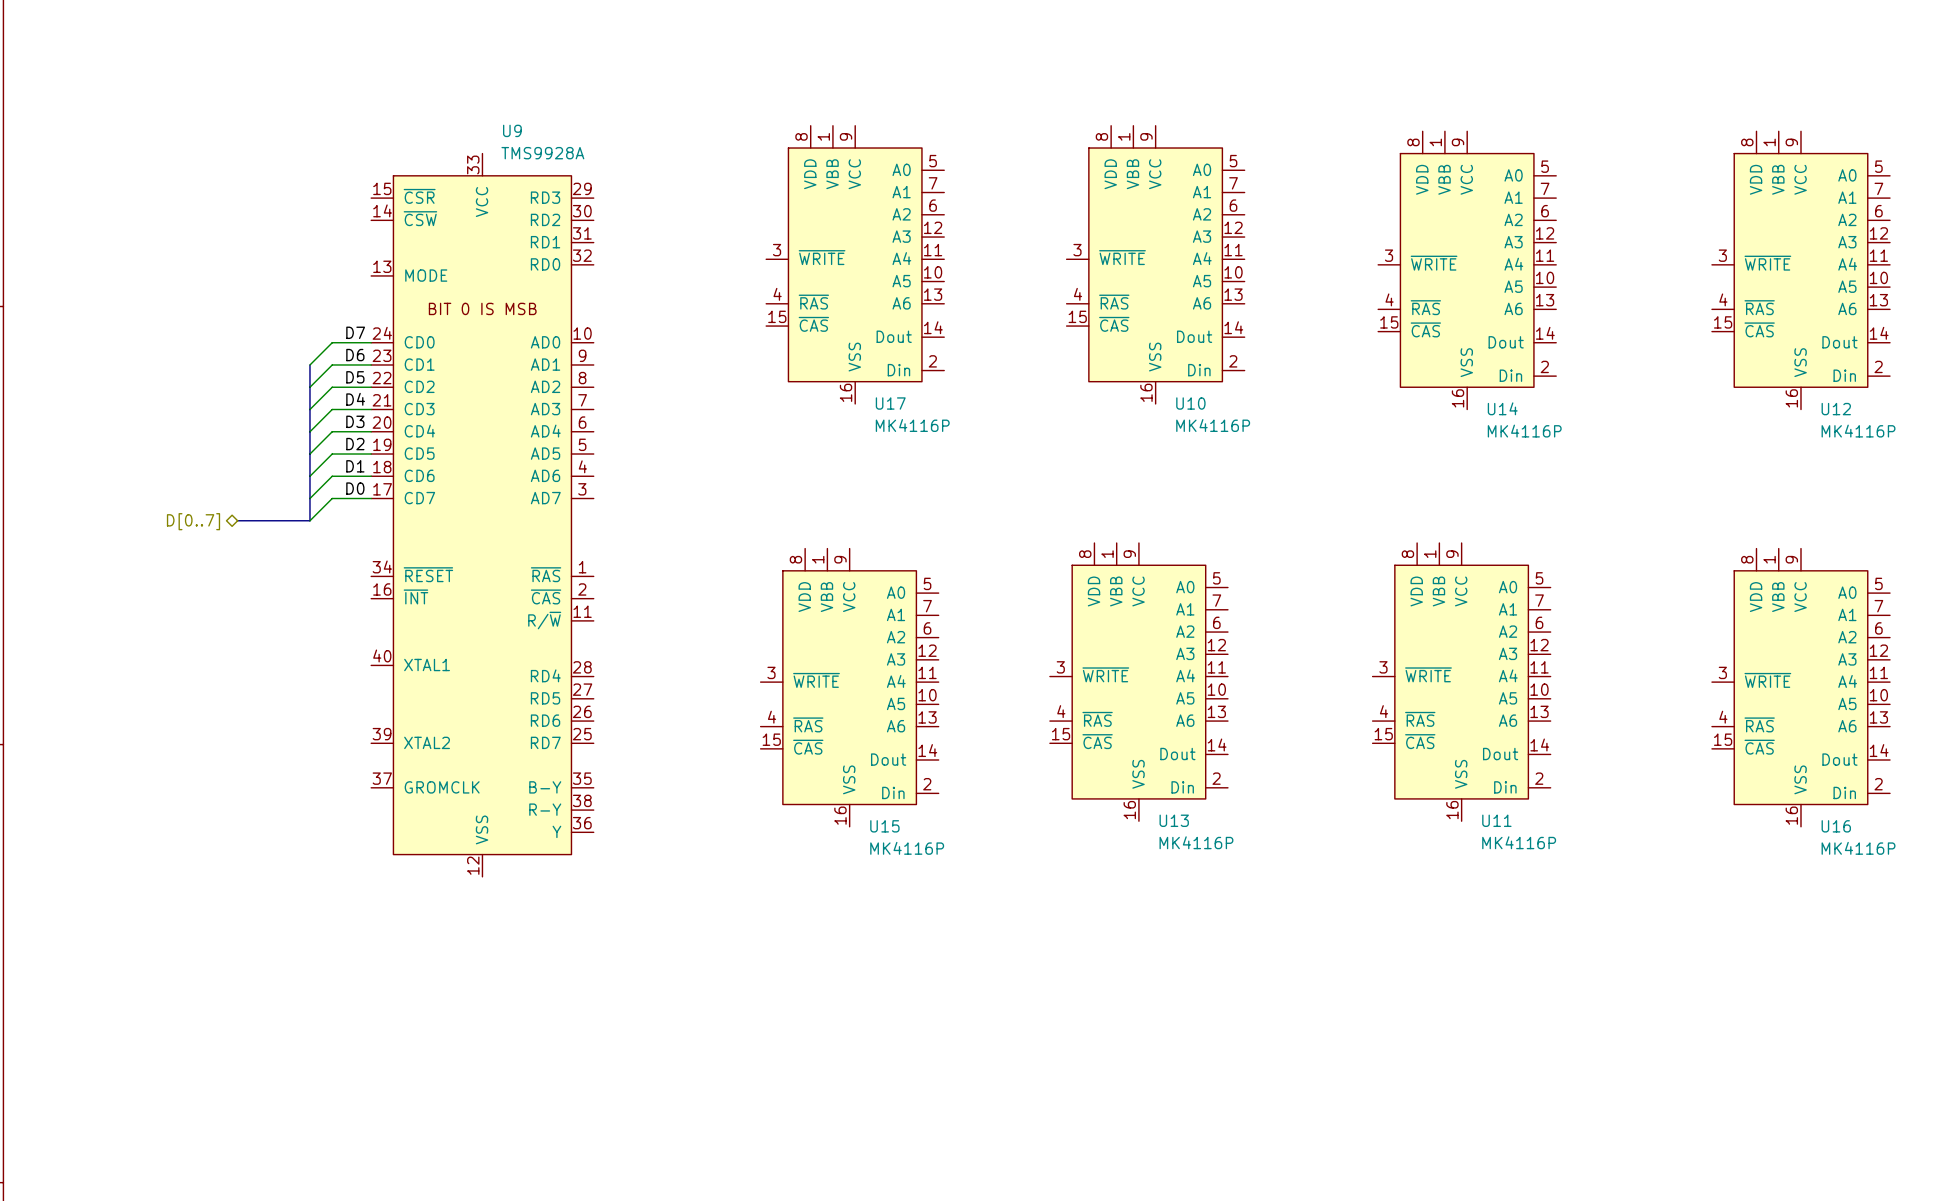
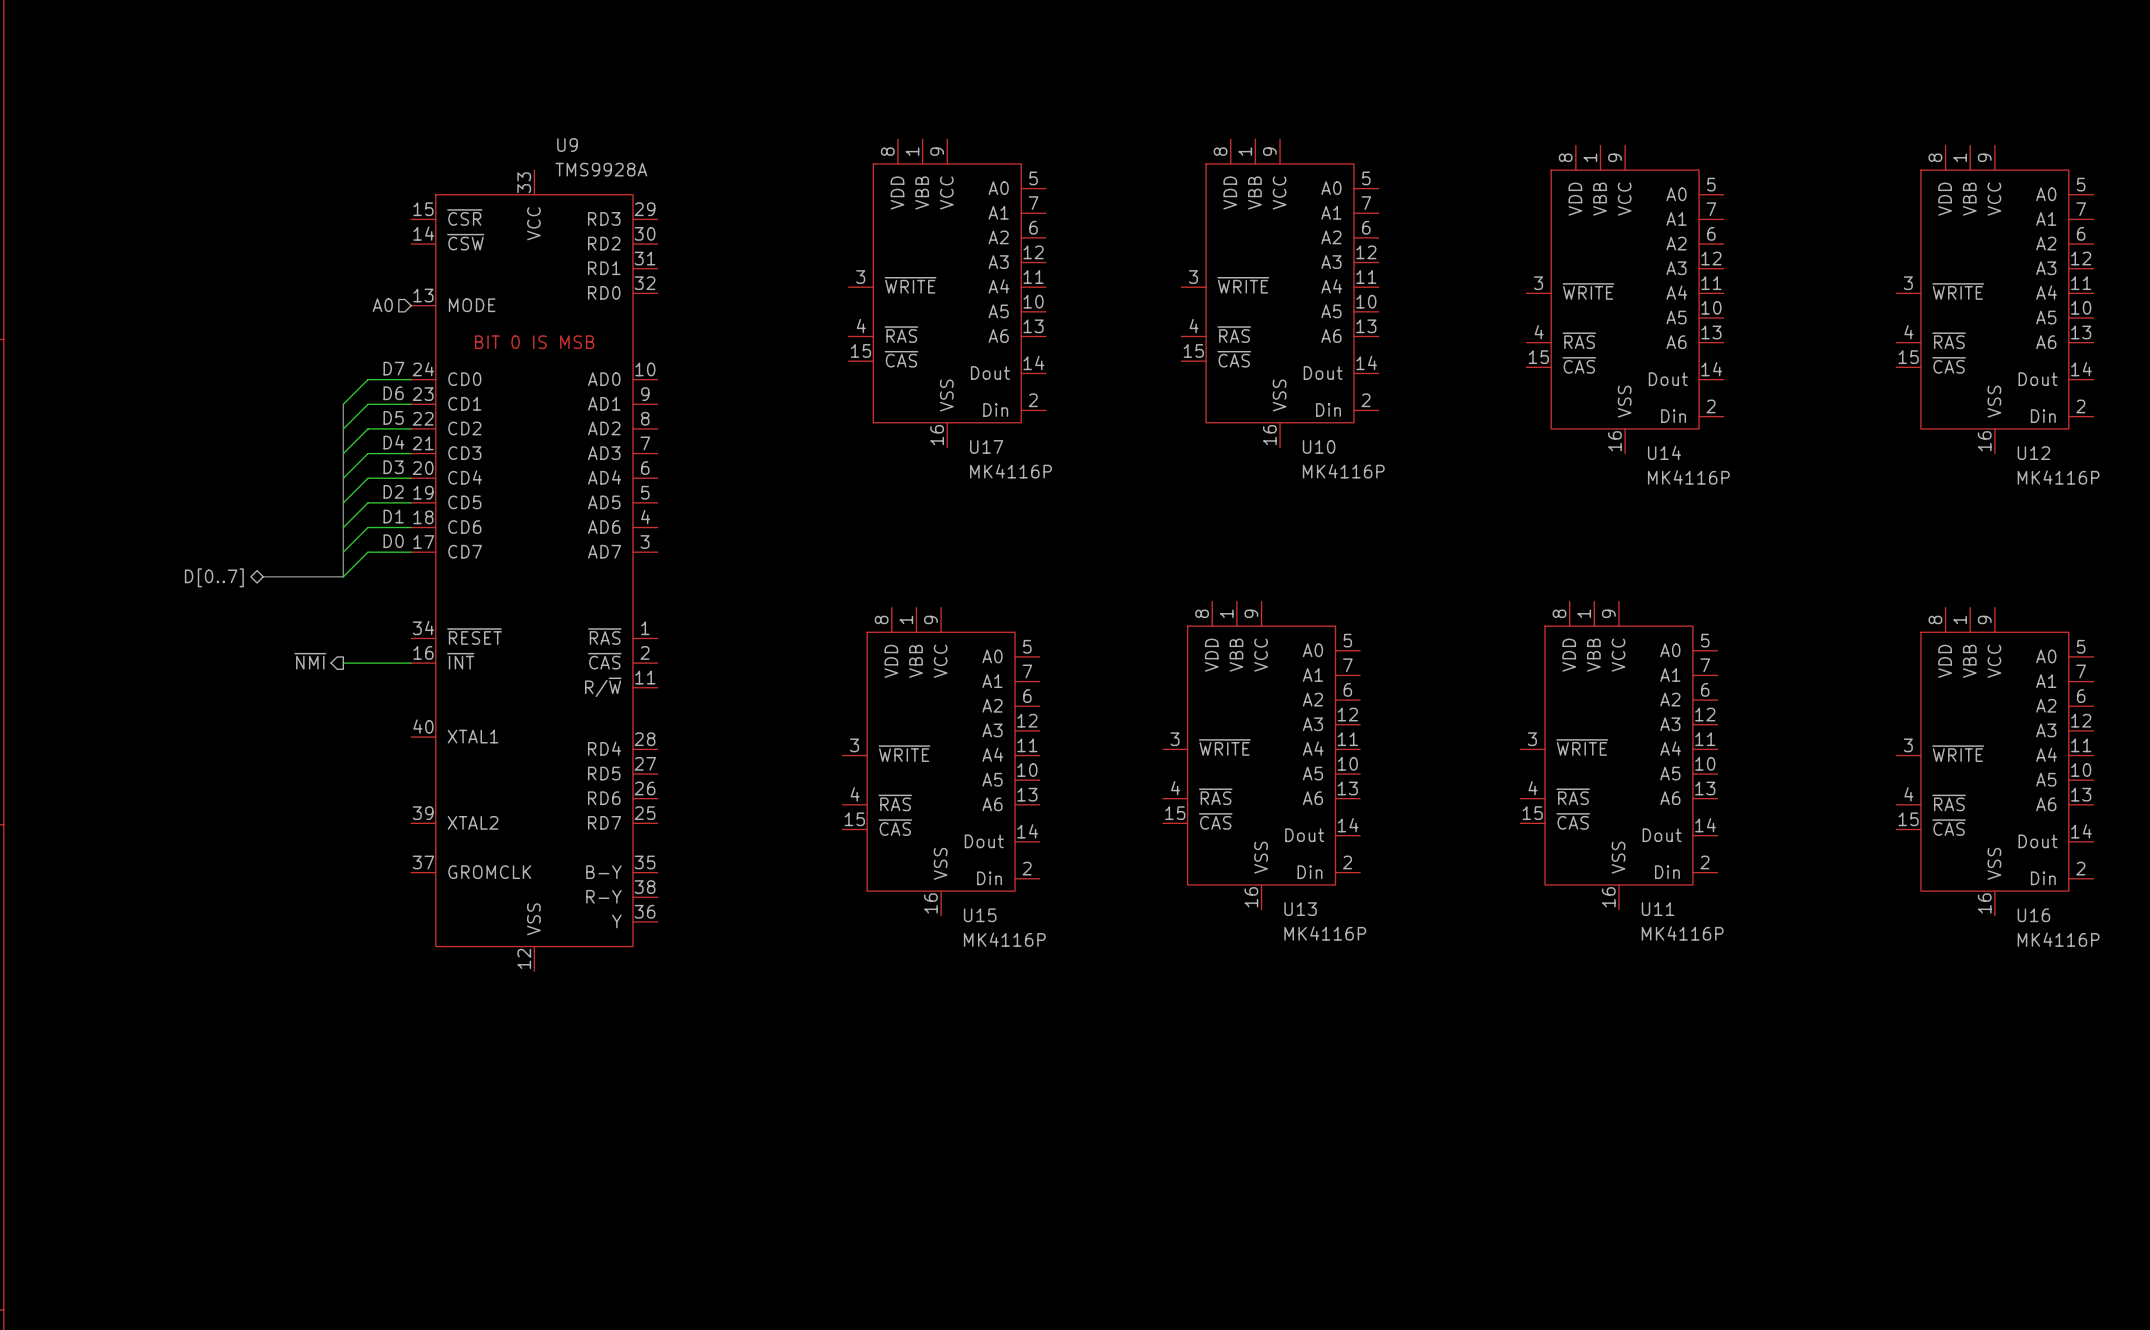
hierarchical label: none -> A0 (382, 305)
hierarchical label: none -> ~{NMI} (310, 661)
wire: none -> (343, 663) (411, 663)

